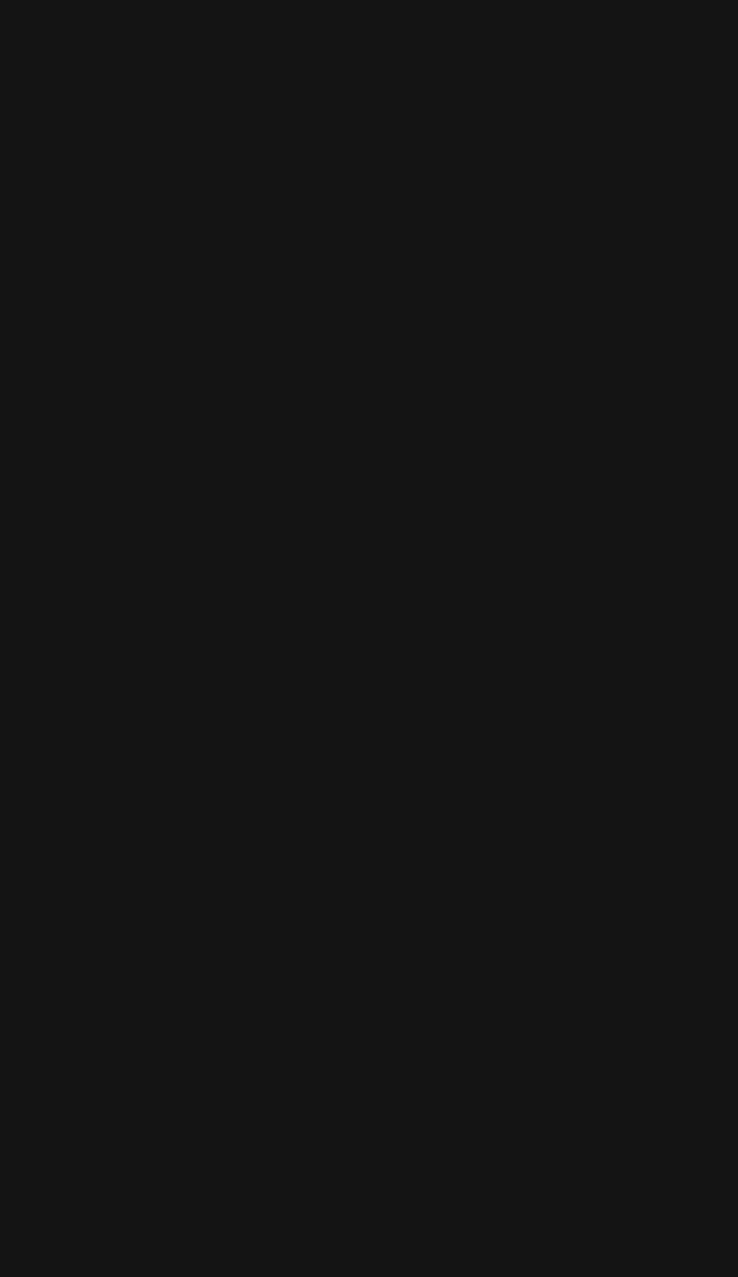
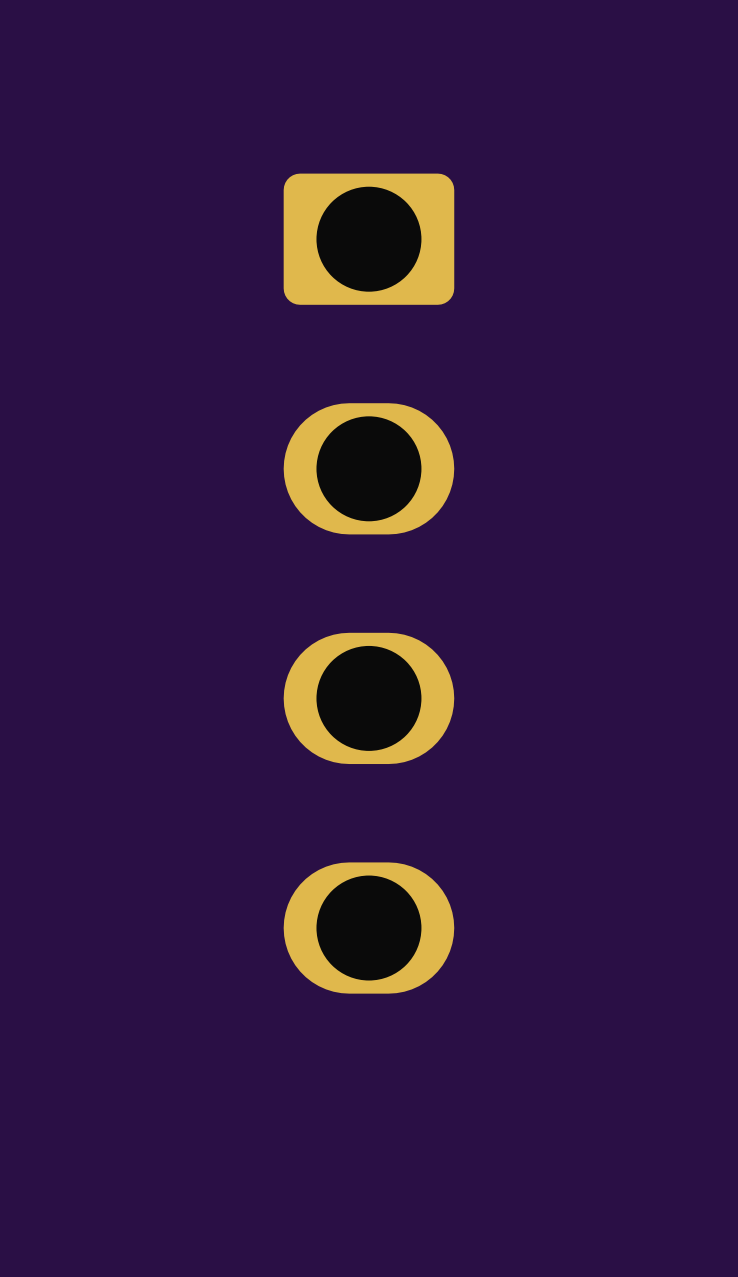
part: none -> (368, 583)

